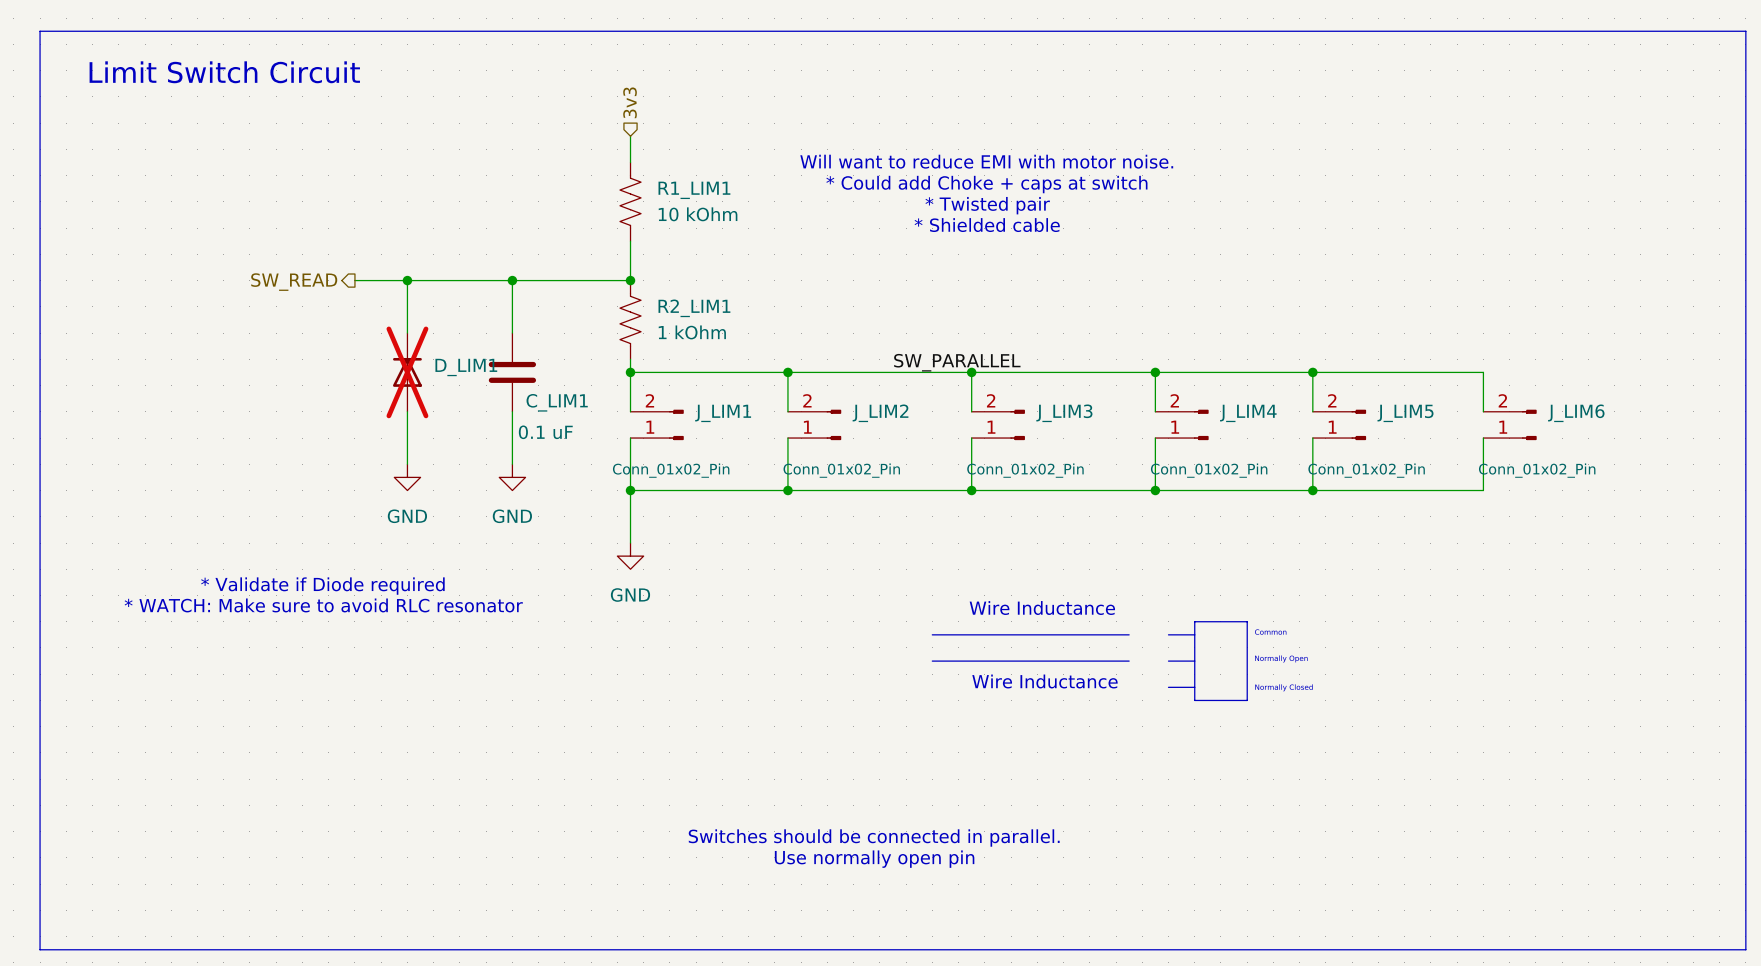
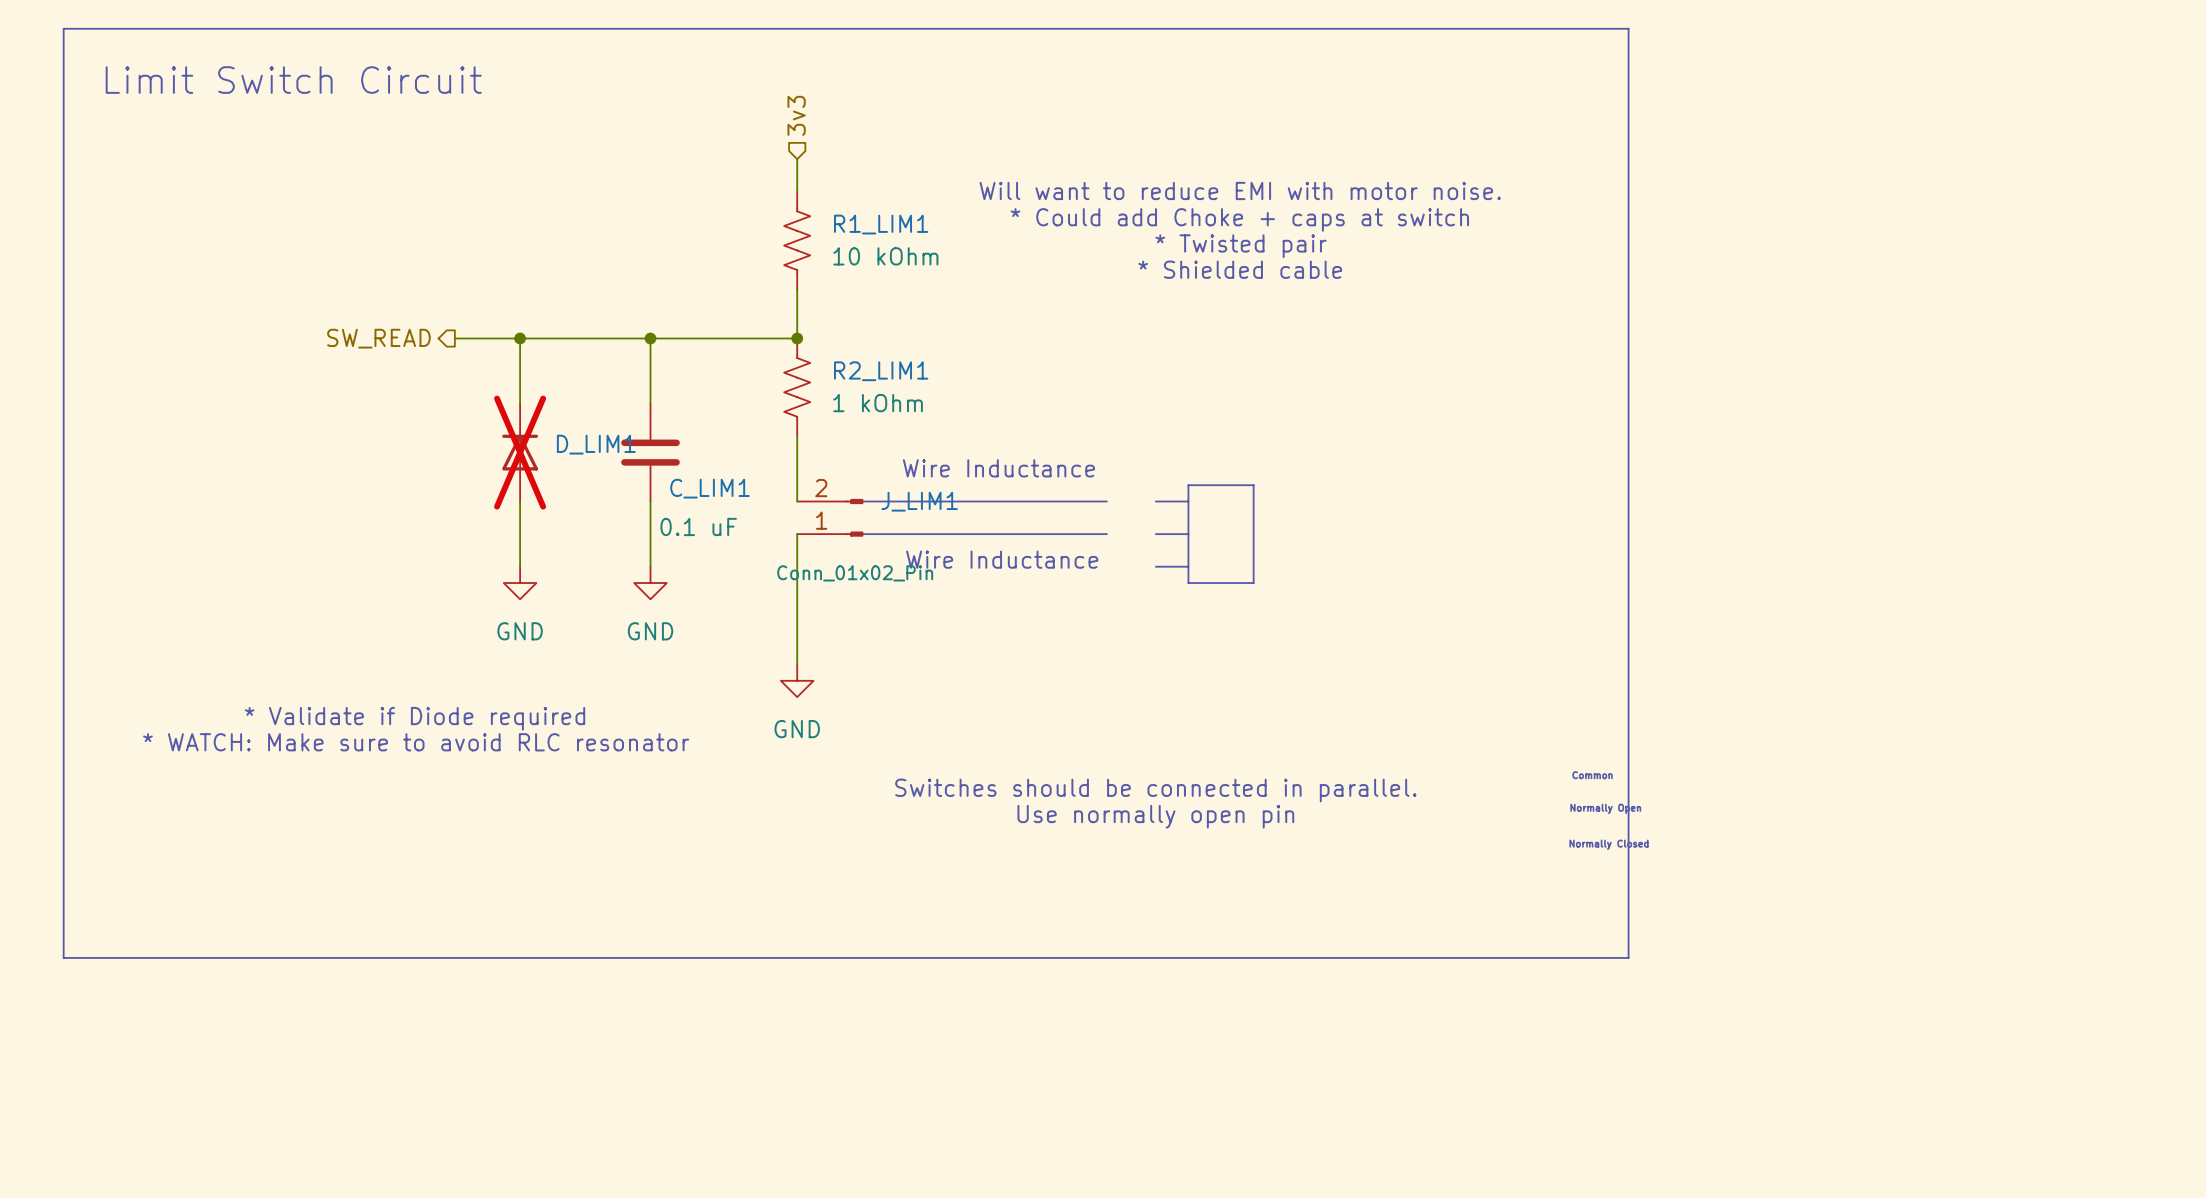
line: (1299, 31) (1745, 31) (1745, 949) (40, 949) (40, 779) -> (1628, 28) (1628, 957) (63, 957)
label: SW_PARALLEL (957, 362) -> none
wire: (630, 372) (1483, 372) (1483, 411) -> none
junction: (630, 372) -> none
wire: (787, 372) (787, 411) -> none
junction: (787, 372) -> none
wire: (971, 372) (971, 411) -> none
junction: (971, 372) -> none
wire: (1155, 372) (1155, 411) -> none
junction: (1155, 372) -> none
wire: (1312, 372) (1312, 411) -> none
junction: (1312, 372) -> none
text: none -> Wire Inductance (998, 468)
line: none -> (1188, 485) (1253, 485) (1253, 583) (1188, 583) (1188, 485)
line: none -> (862, 501) (1106, 501)
line: none -> (1155, 501) (1188, 501)
J_LIM2: Conn_01x02_Pin (814, 424) -> none
J_LIM3: Conn_01x02_Pin (998, 424) -> none
J_LIM4: Conn_01x02_Pin (1182, 424) -> none
J_LIM5: Conn_01x02_Pin (1339, 424) -> none
J_LIM6: Conn_01x02_Pin (1510, 424) -> none
line: none -> (862, 534) (1106, 534)
wire: (787, 438) (787, 490) -> none
line: none -> (1155, 534) (1188, 534)
wire: (971, 438) (971, 490) -> none
wire: (1155, 438) (1155, 490) -> none
wire: (1312, 438) (1312, 490) -> none
wire: (1483, 438) (1483, 490) (630, 490) -> none
text: none -> Wire Inductance (1002, 559)
line: none -> (1155, 566) (1188, 566)
junction: (630, 490) -> none
junction: (787, 490) -> none
junction: (971, 490) -> none
junction: (1155, 490) -> none
junction: (1312, 490) -> none
text: Wire Inductance (1042, 608) -> none
line: (1194, 621) (1247, 621) (1247, 700) (1194, 700) (1194, 621) -> none
line: (932, 634) (1129, 634) -> none
line: (1168, 634) (1194, 634) -> none
line: (932, 661) (1129, 661) -> none
line: (1168, 661) (1194, 661) -> none
text: Wire Inductance (1044, 681) -> none
line: (1168, 687) (1194, 687) -> none
text position: Switches should be connected in parallel. (874, 838) -> Switches should be connected in parallel. (1155, 790)
text position: Use normally open pin (874, 859) -> Use normally open pin (1155, 816)

